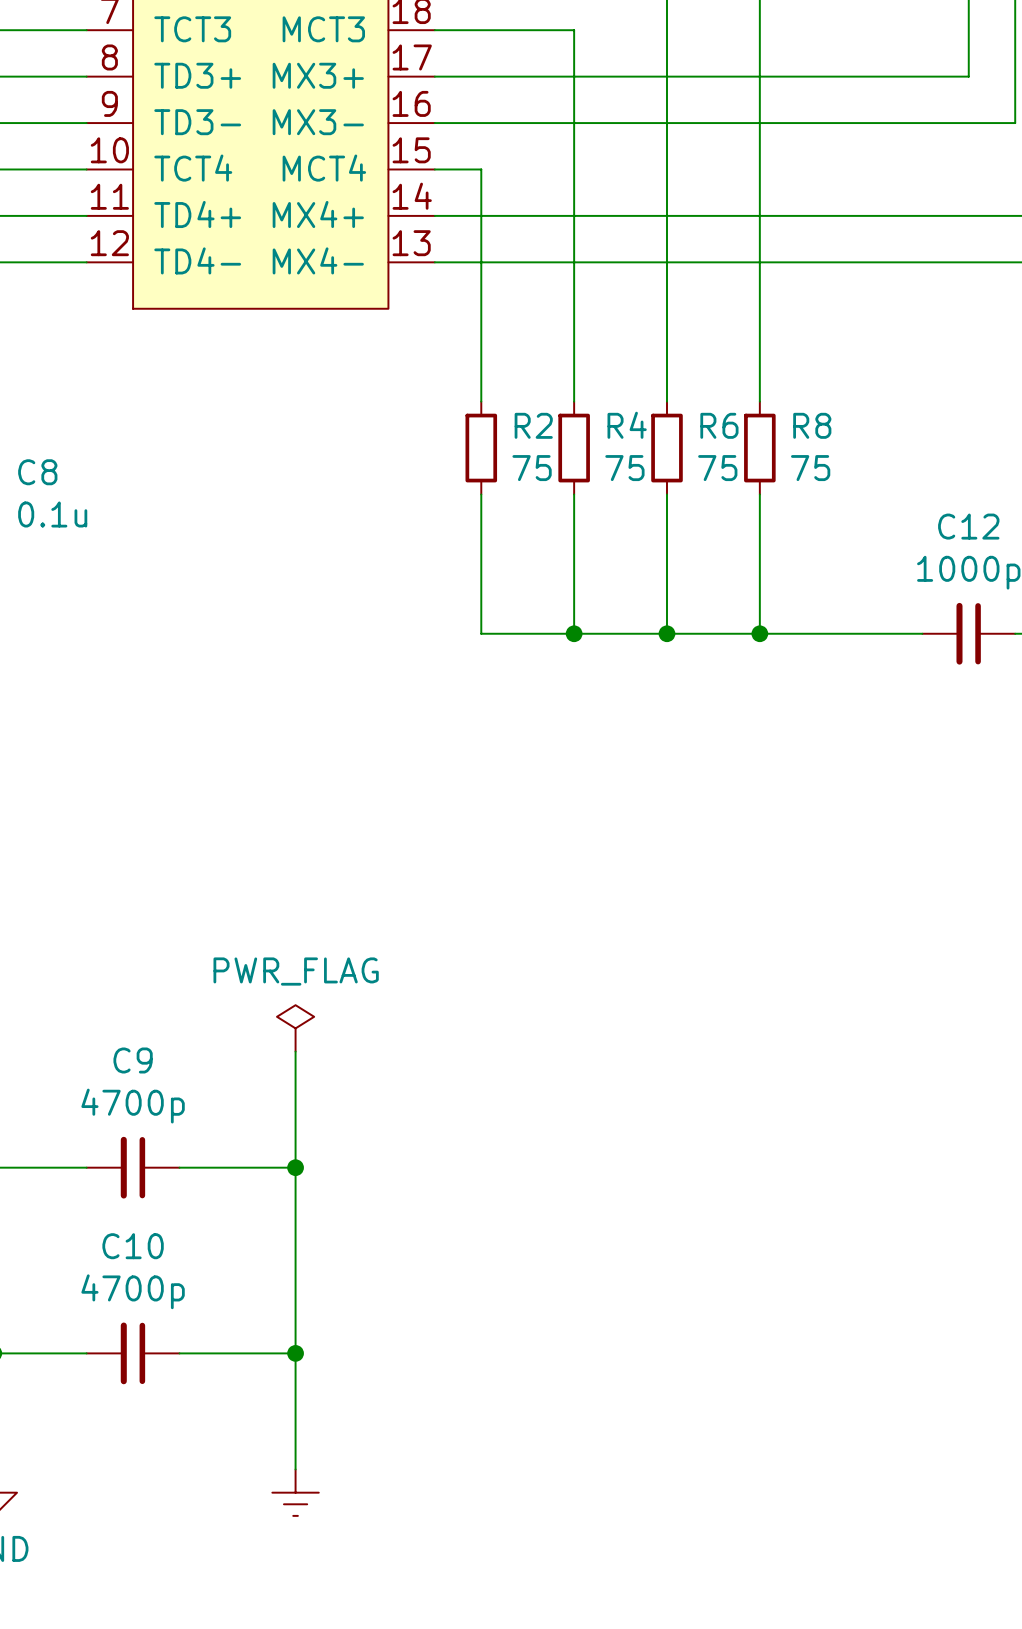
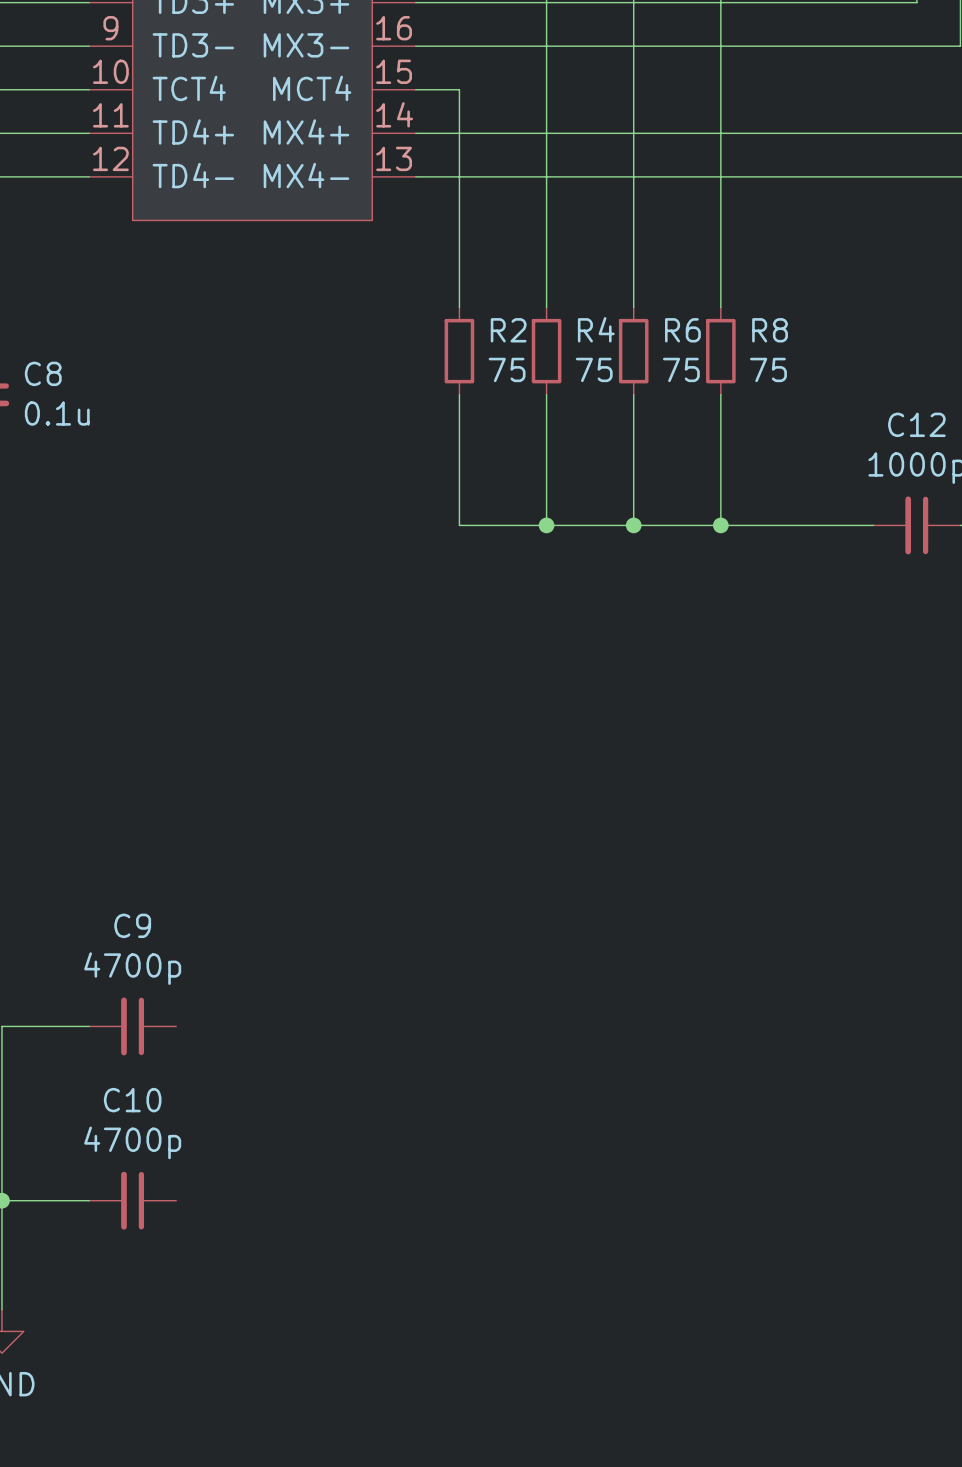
power symbol: PWR_FLAG (295, 1028) -> none
wire: (295, 1051) (295, 1469) -> none
wire: (179, 1167) (295, 1167) -> none
junction: (295, 1167) -> none
wire: (179, 1353) (295, 1353) -> none
junction: (295, 1353) -> none
power symbol: (295, 1492) -> none

